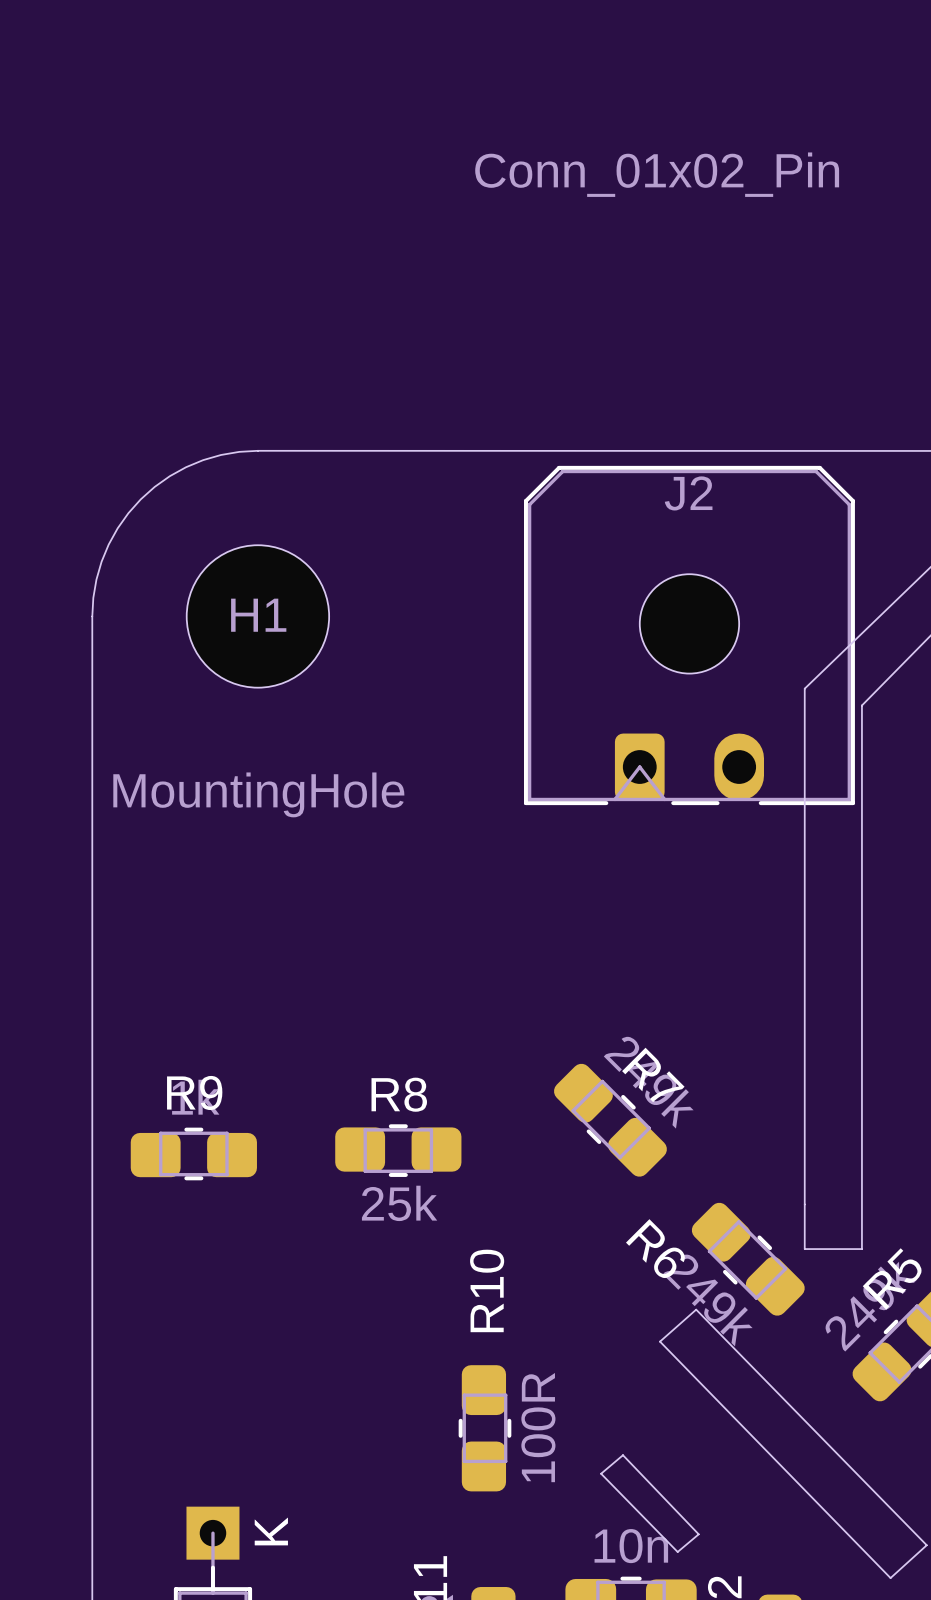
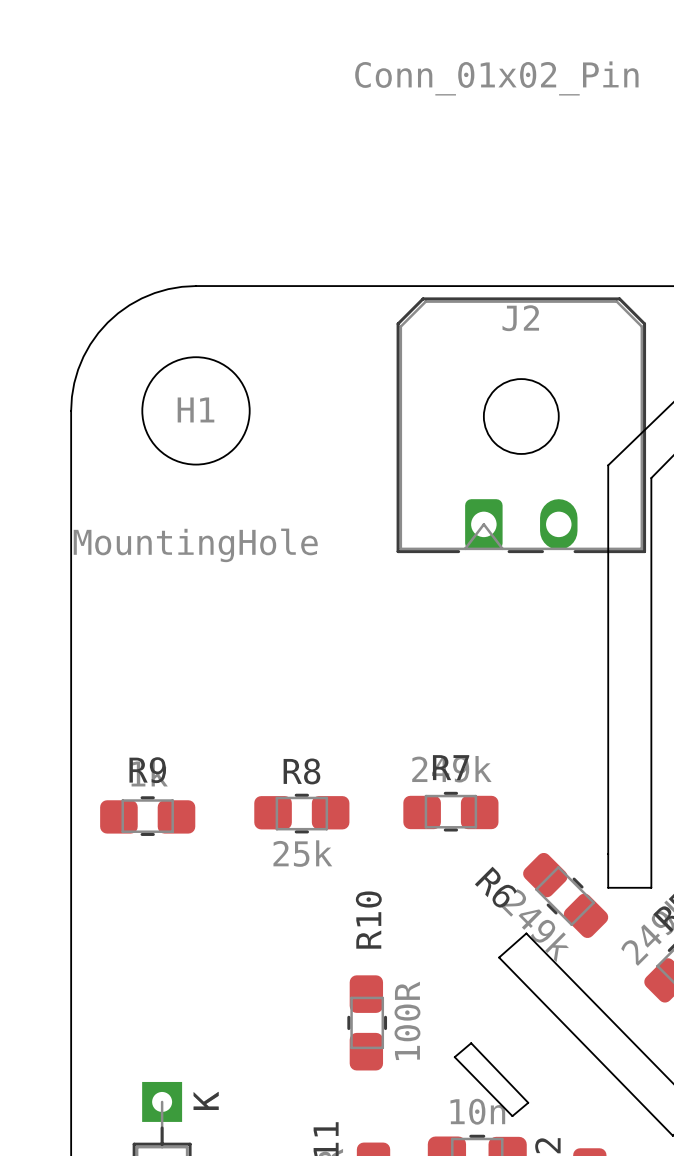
R7 rotation: 0° (610, 1120) -> 45° counterclockwise (450, 811)

